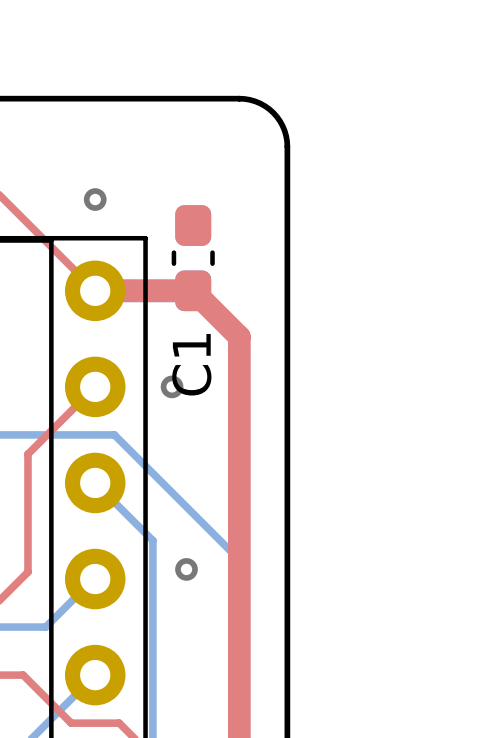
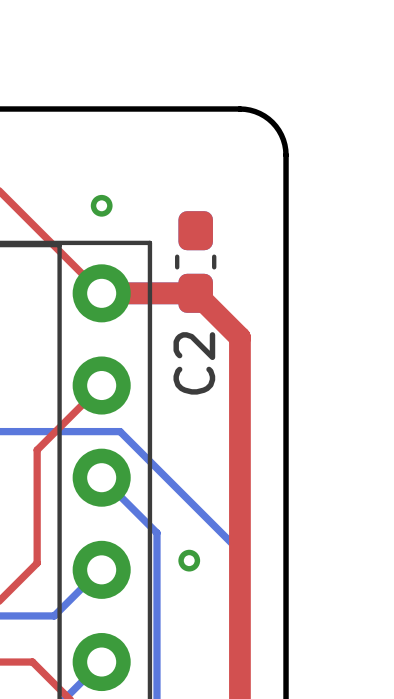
C1 name: C1 (191, 364) -> C2 (194, 363)
via: (172, 386) -> none

